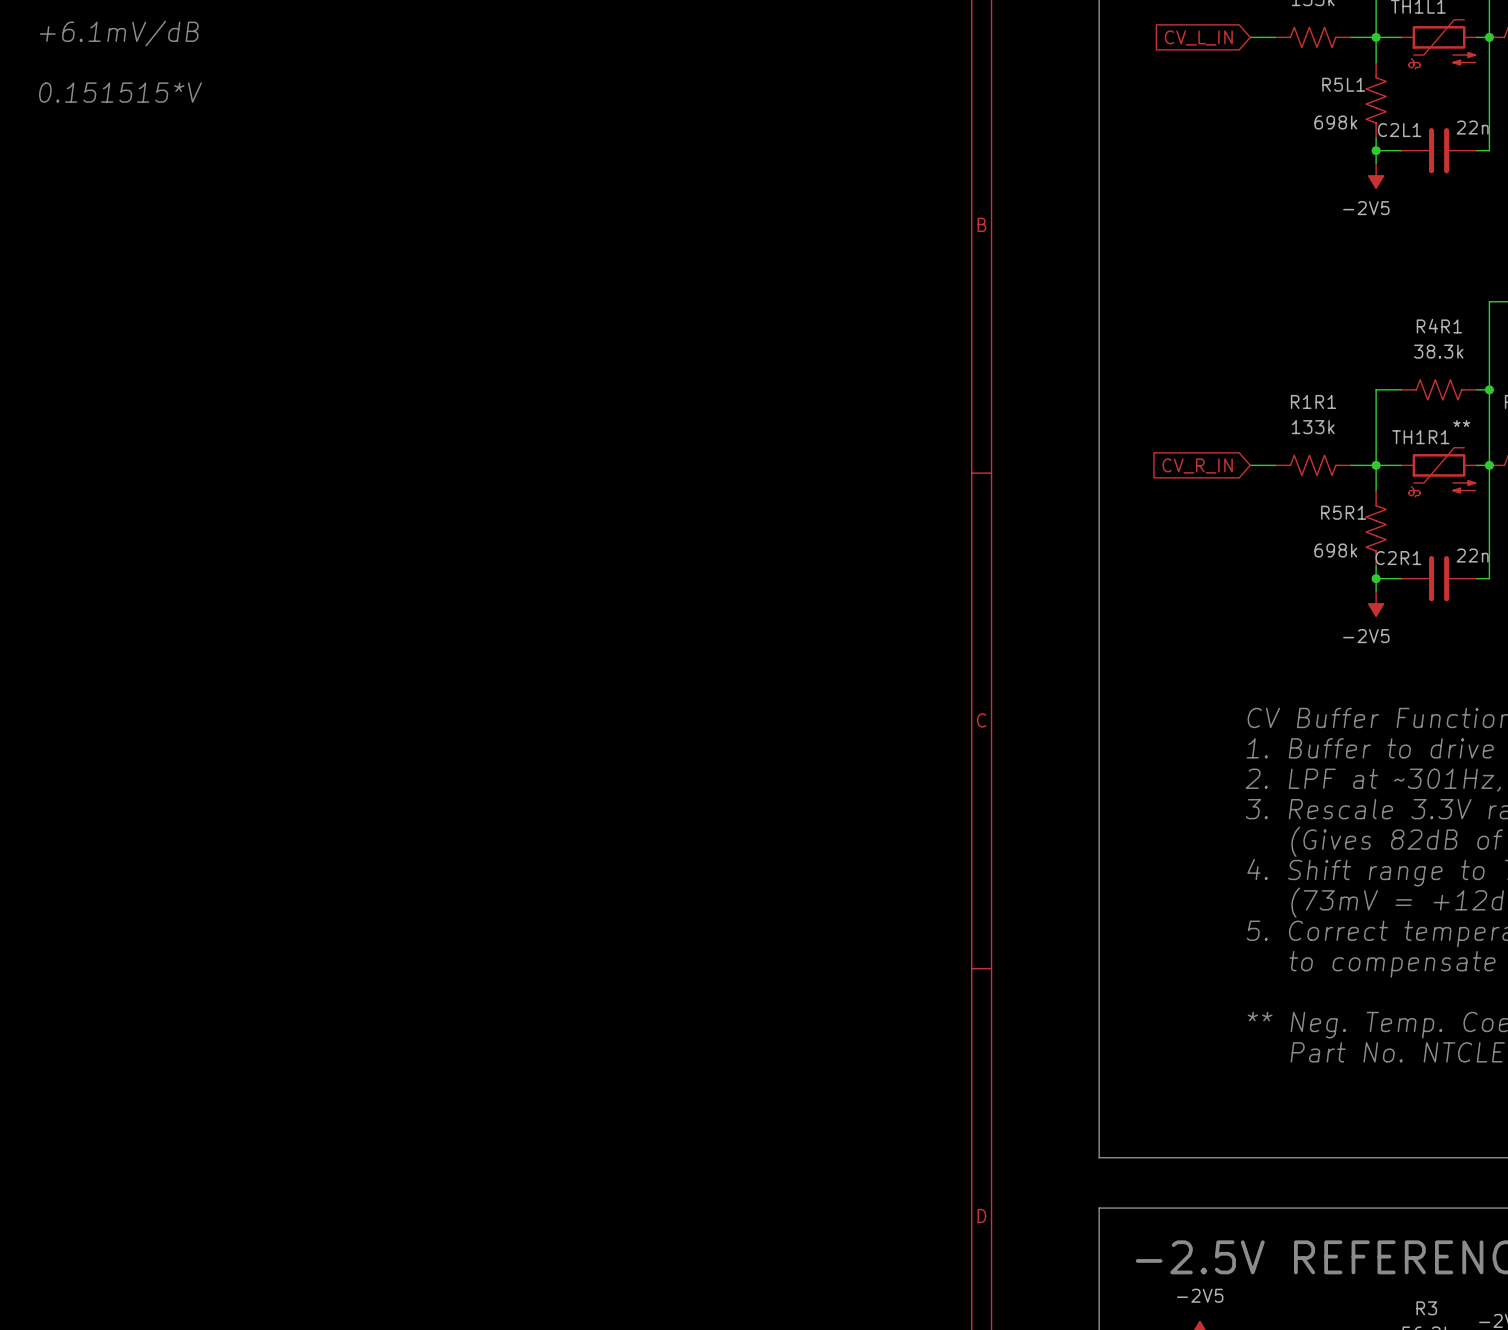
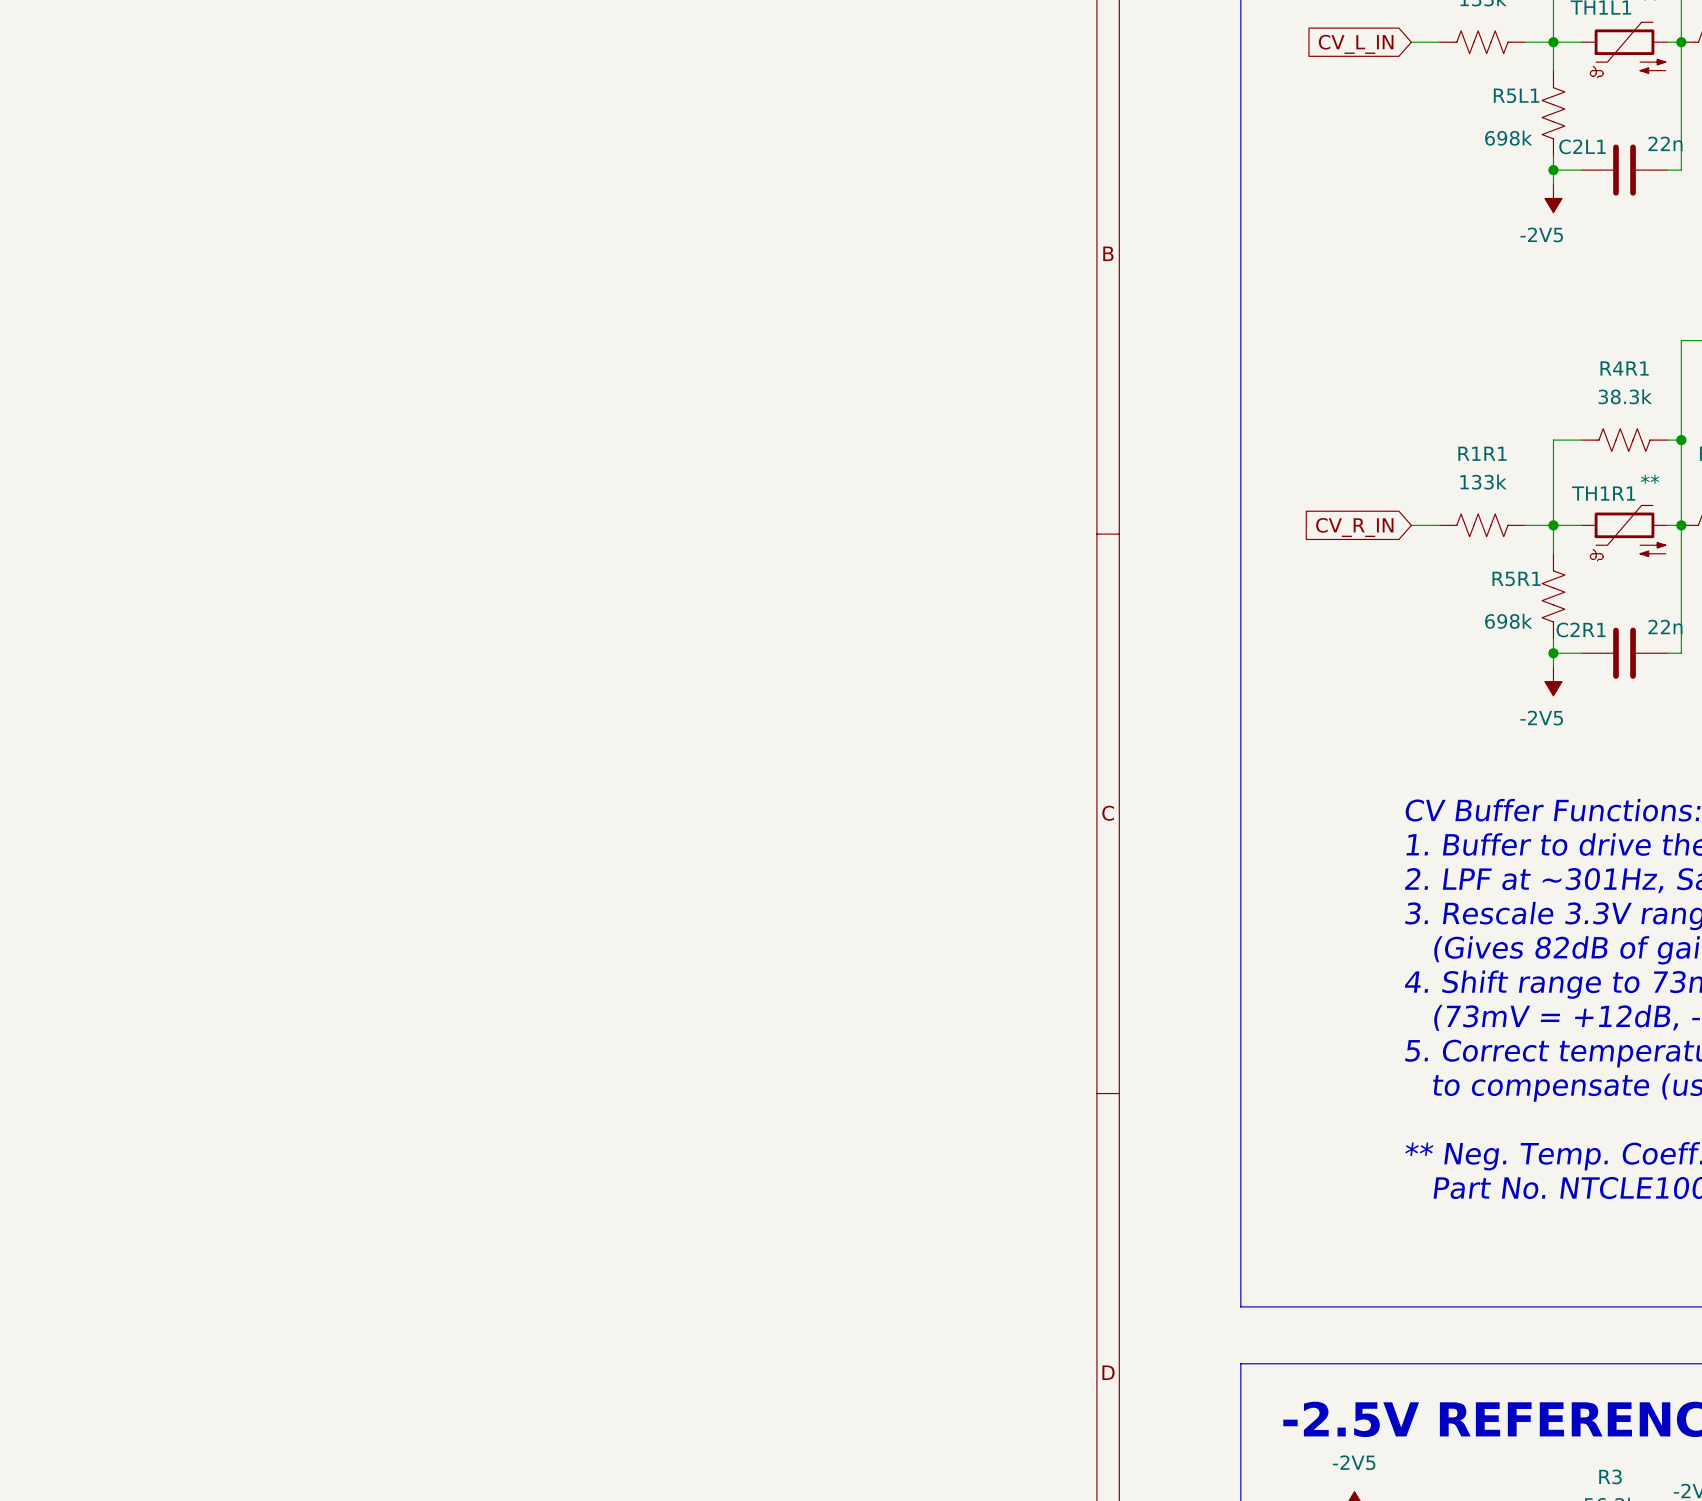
text: +6.1mV/dB (119, 33) -> none
text: 0.151515*V (120, 92) -> none

